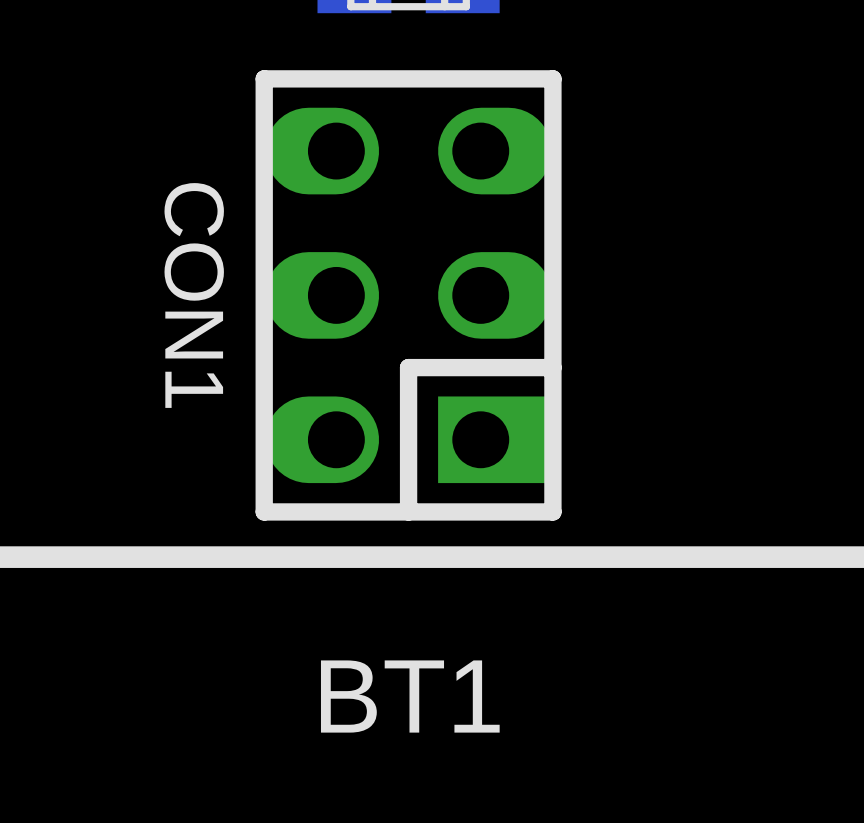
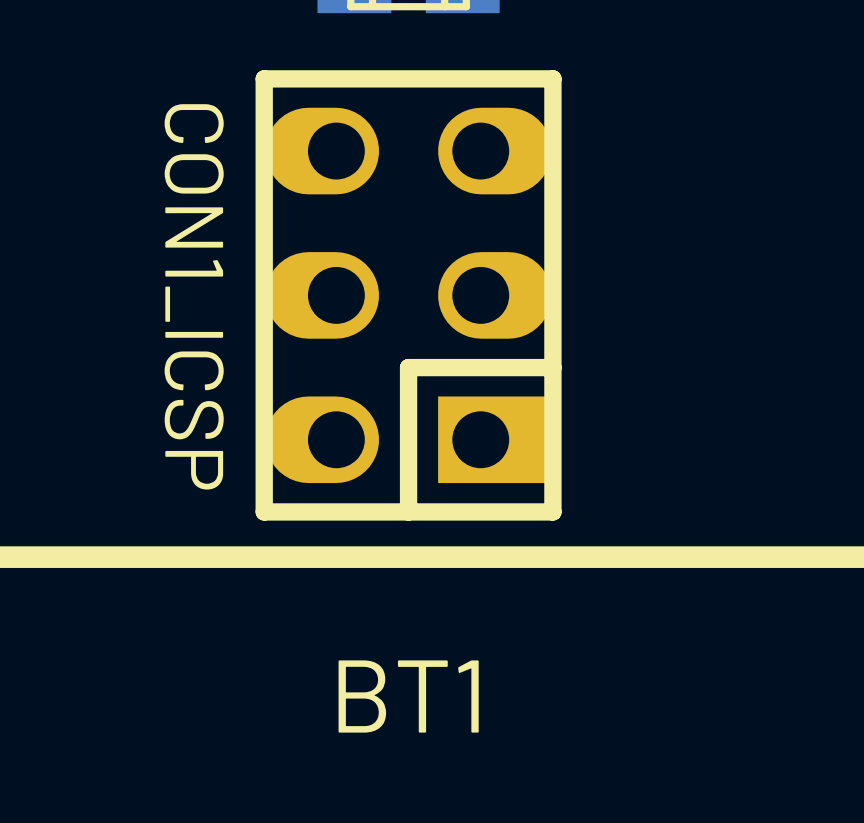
CON1 name: CON1 (194, 295) -> CON1_ICSP (194, 296)

